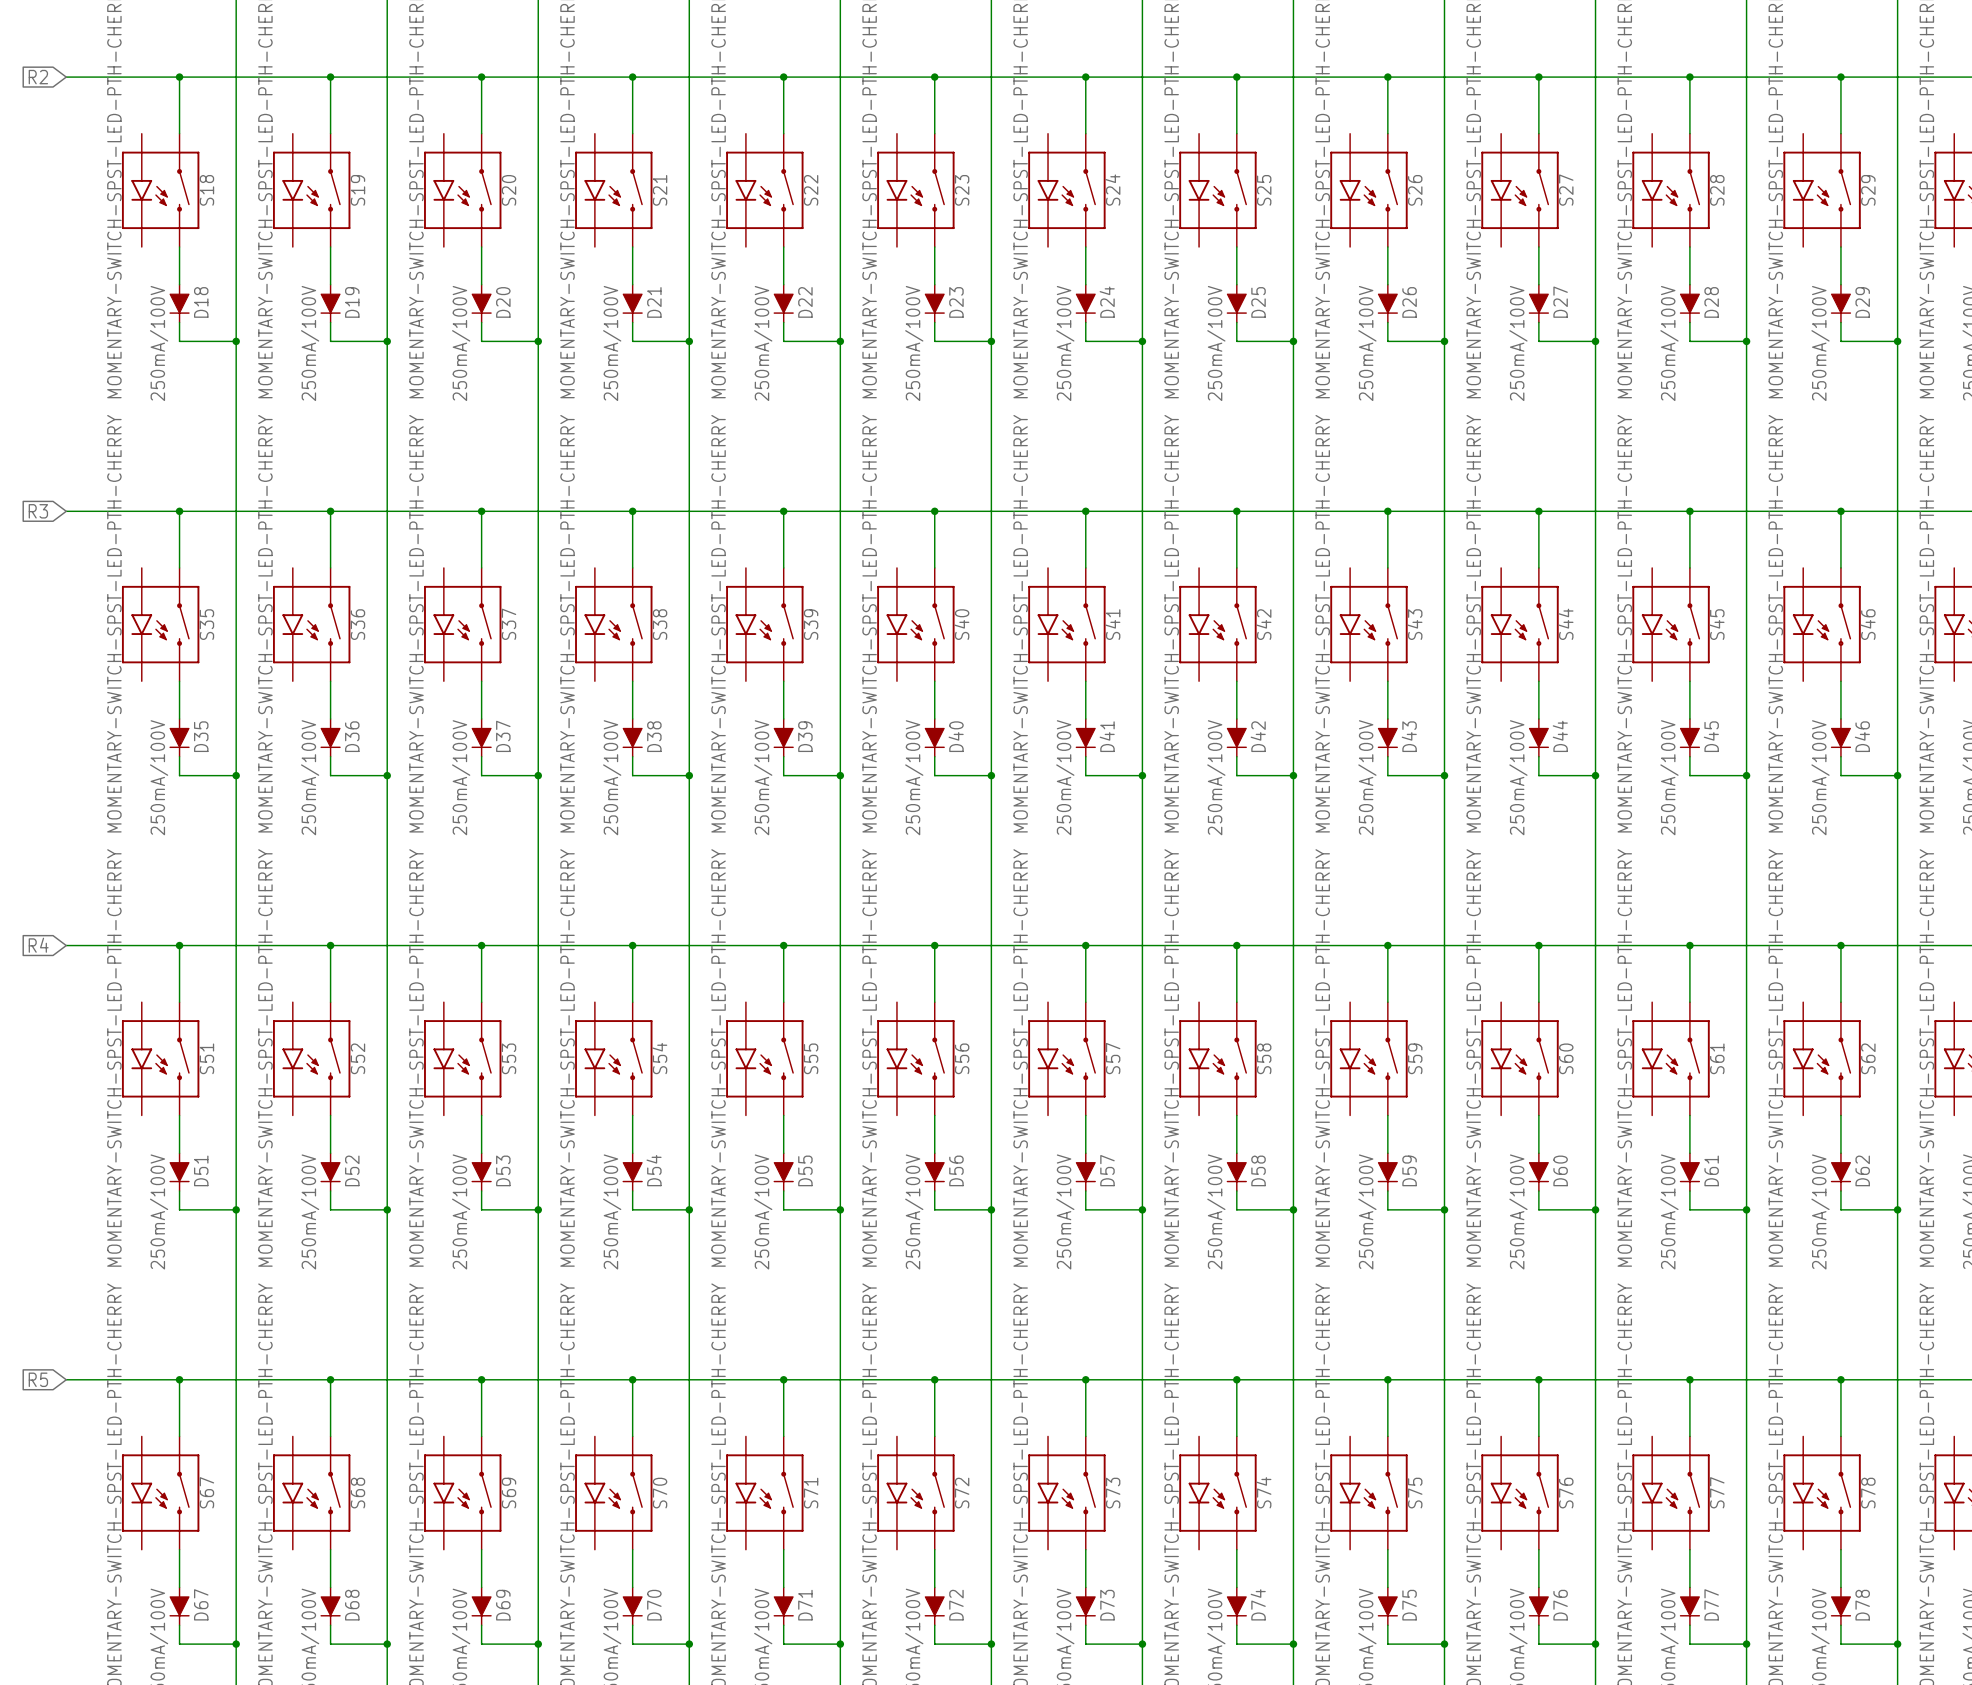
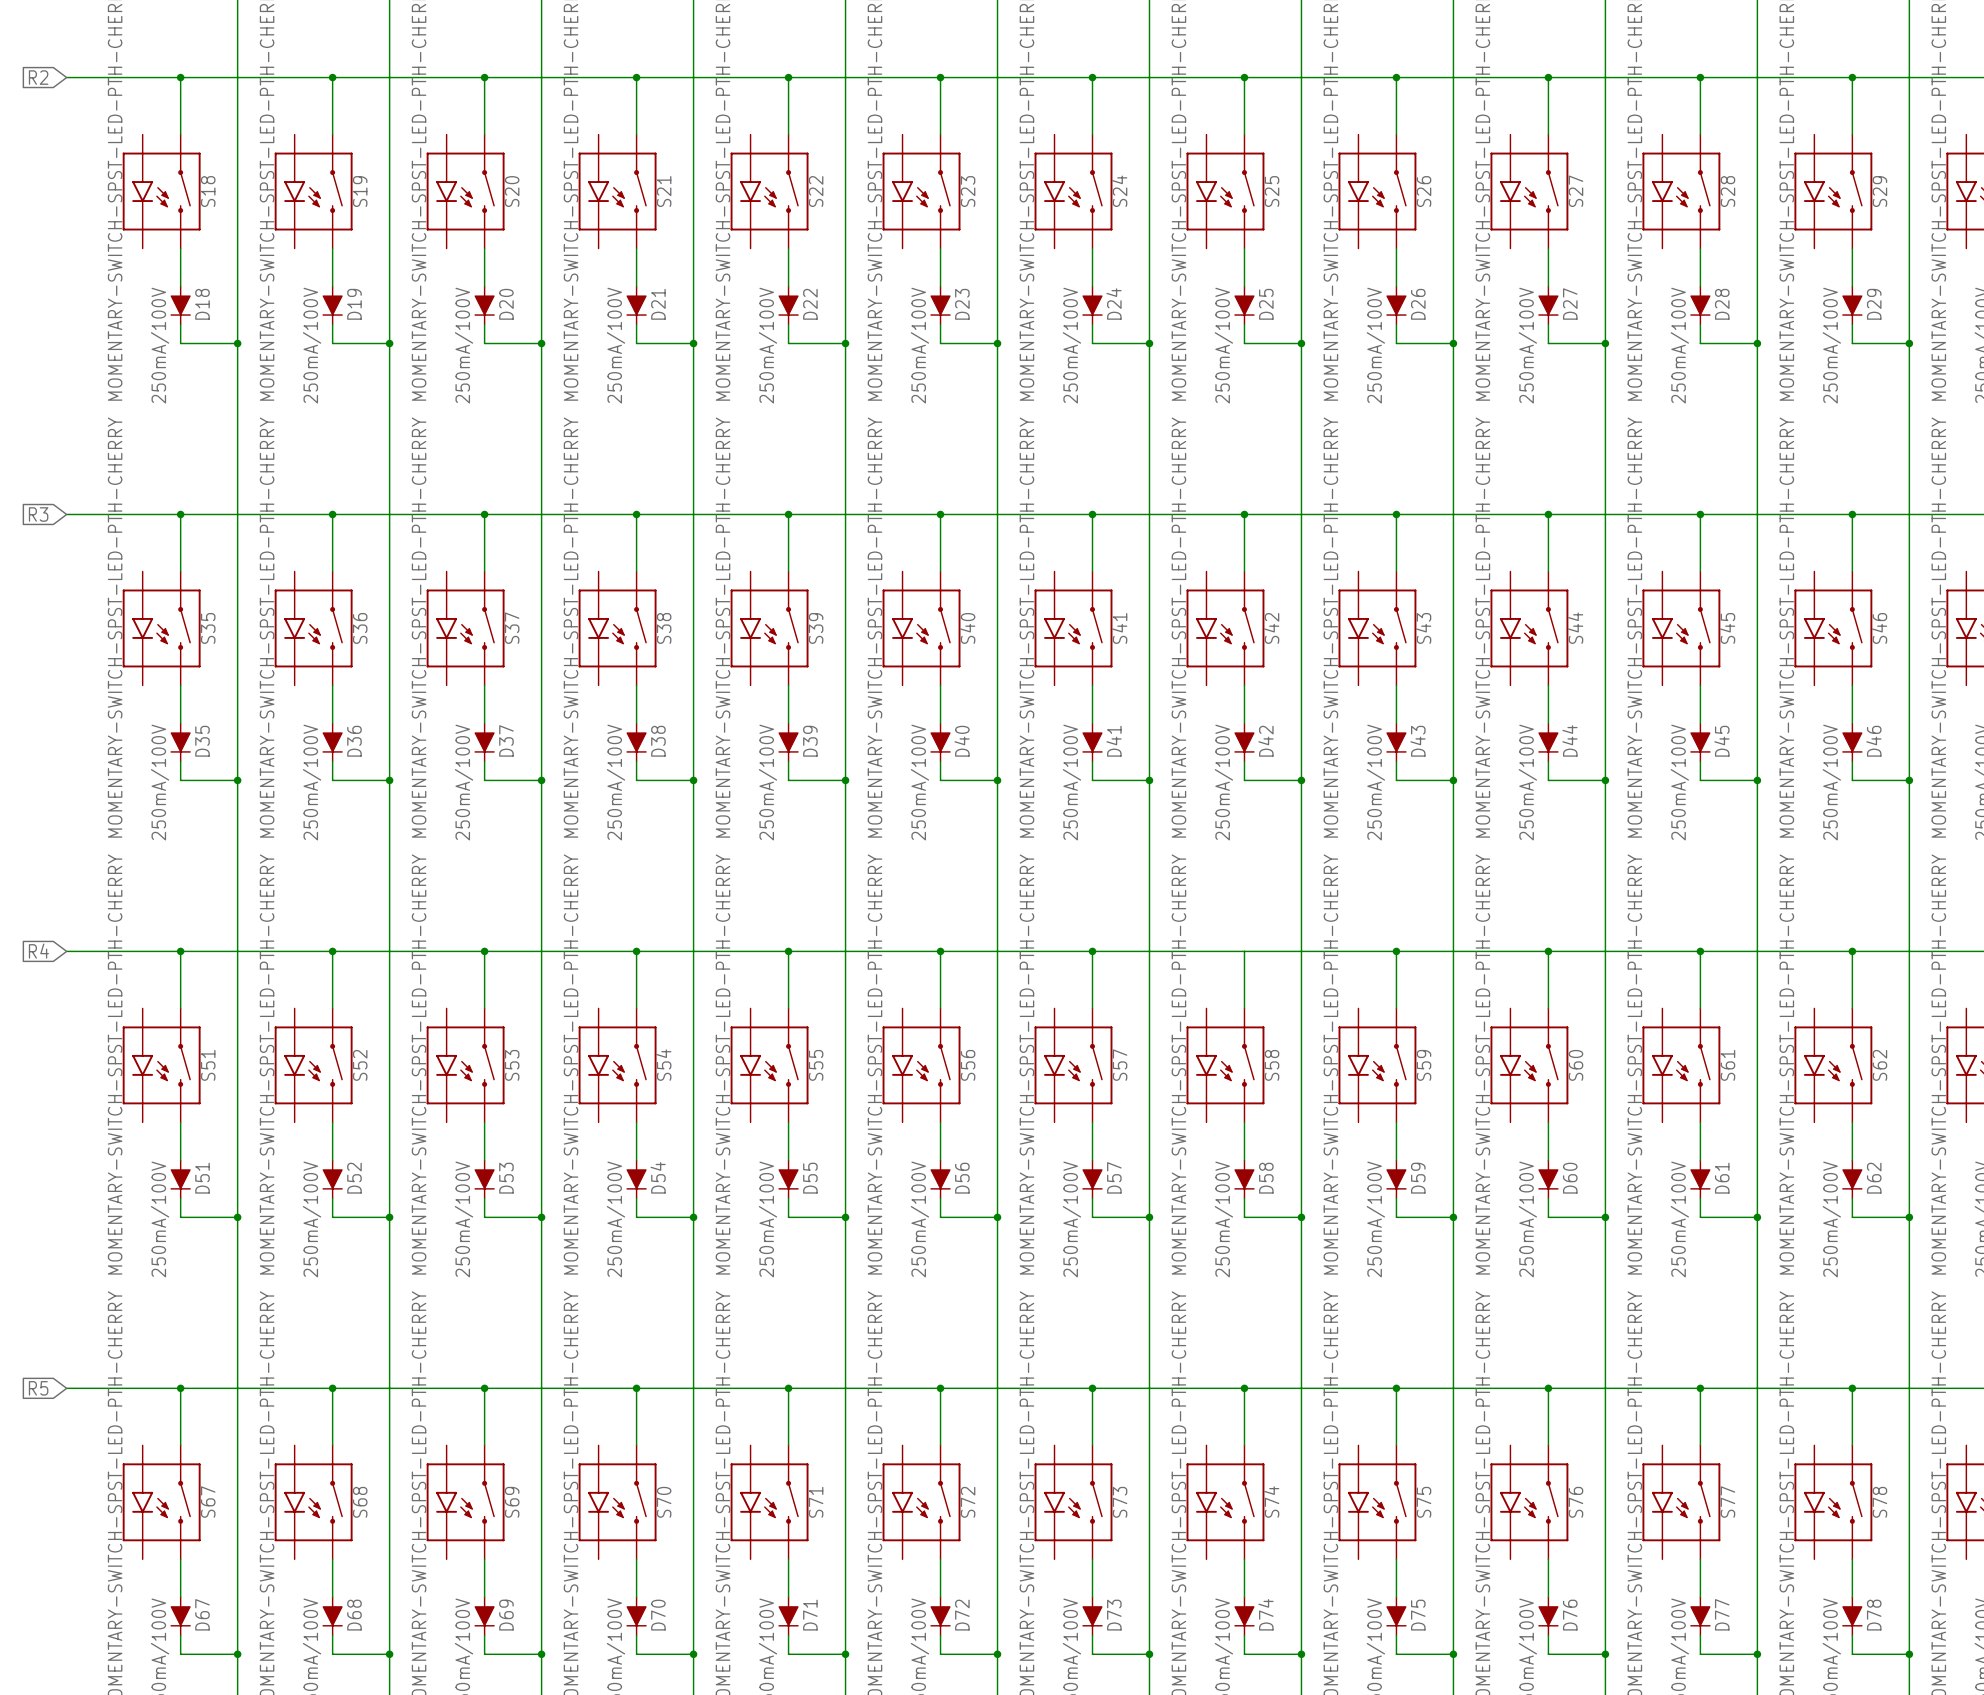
junction: (1236, 945) -> none

